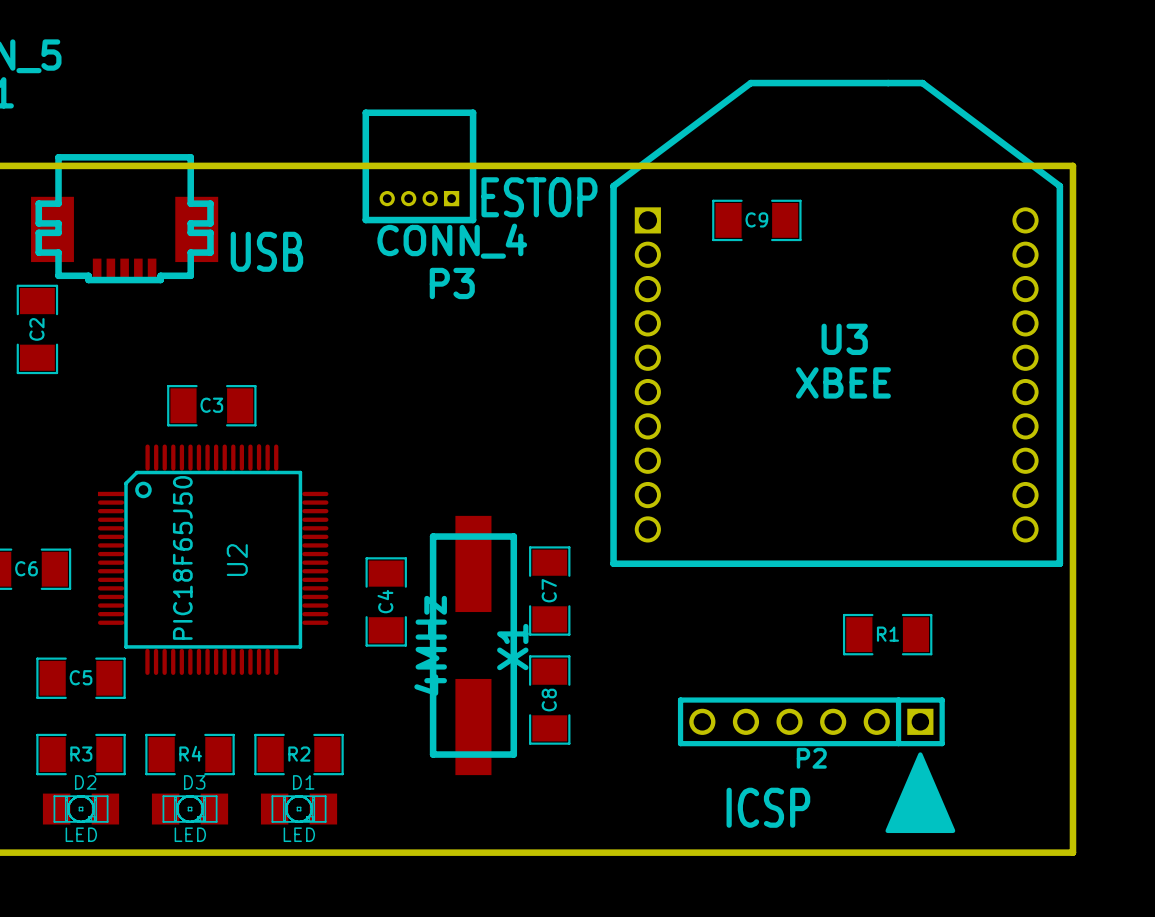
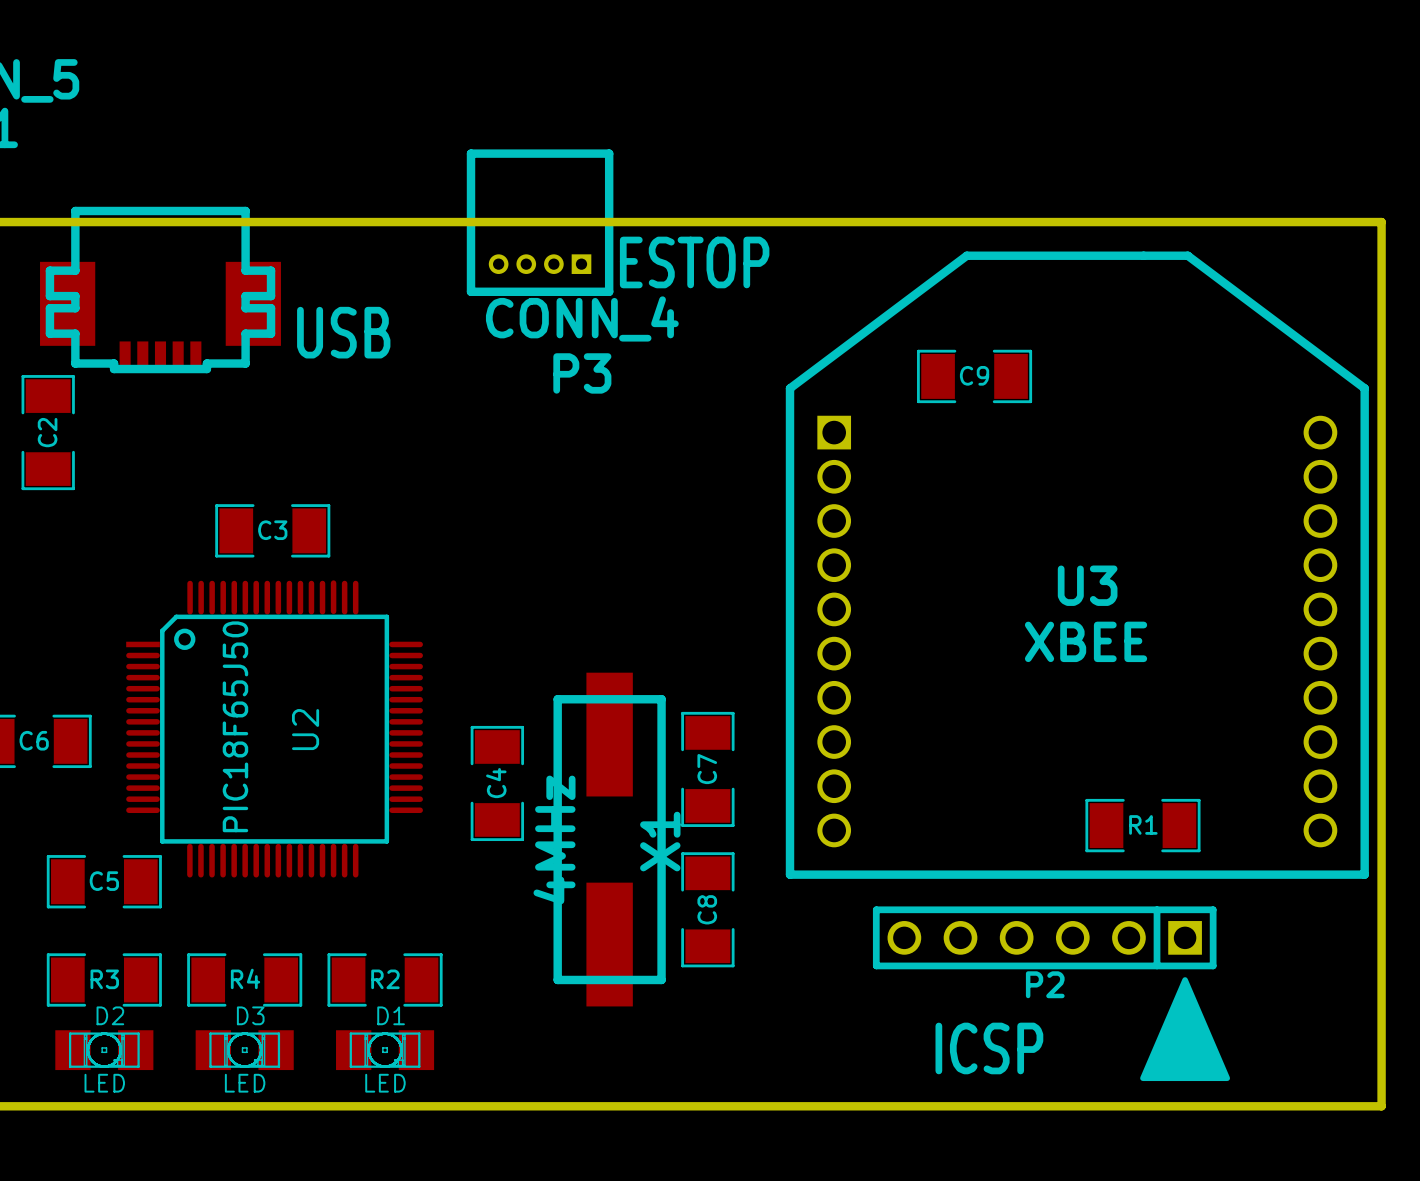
C9 position: (756, 220) -> (974, 376)
U3 position: (836, 323) -> (1077, 565)

